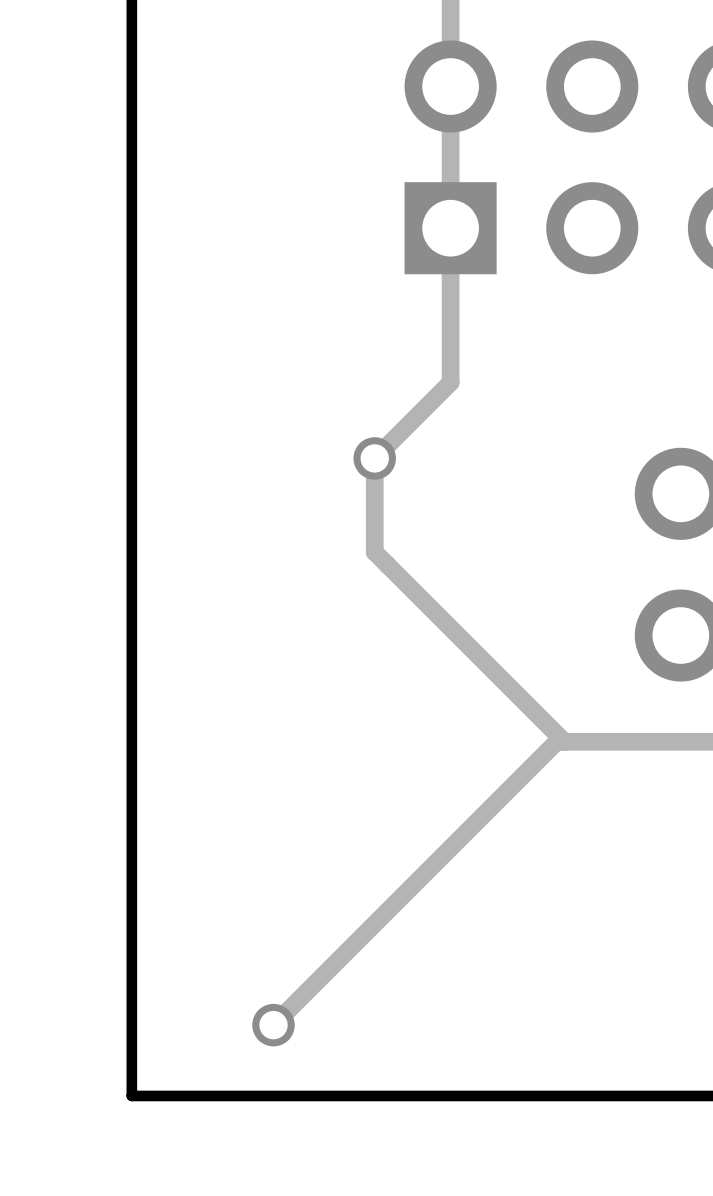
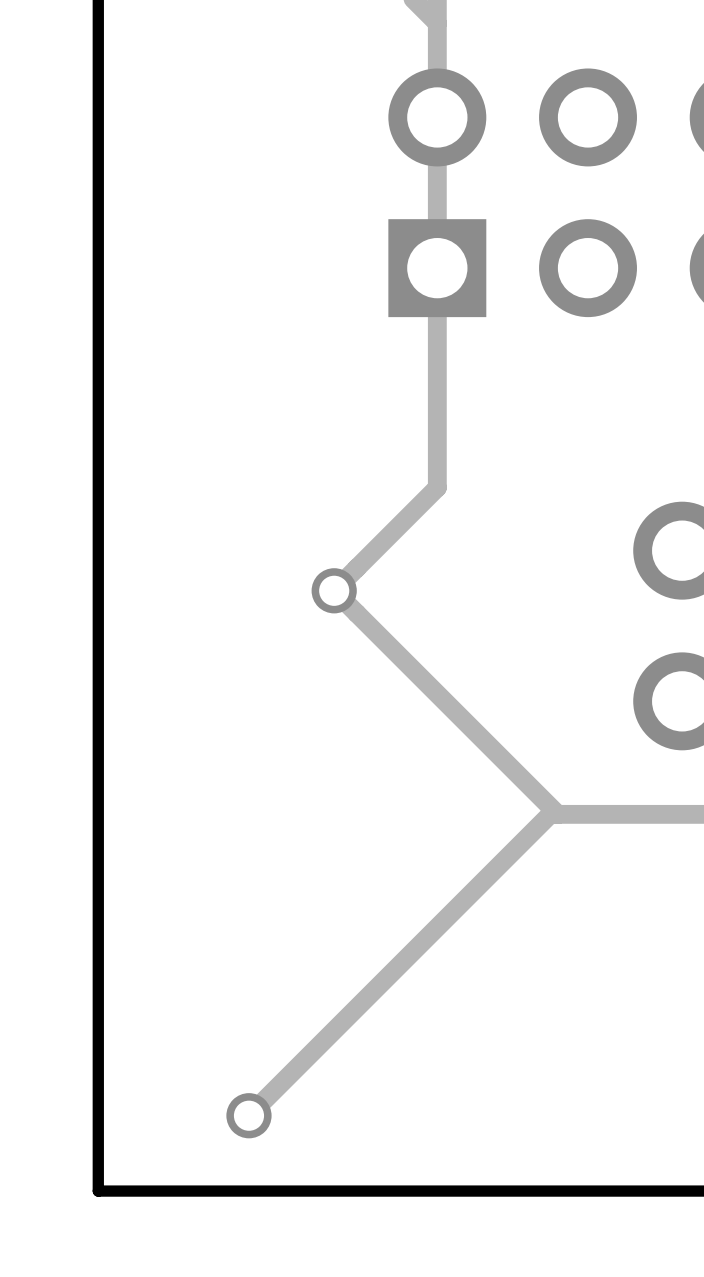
track: (450, 382) (374, 458) (374, 552) (564, 741) -> (437, 432) (437, 487) (334, 590) (557, 814)
via position: (374, 458) -> (334, 590)

